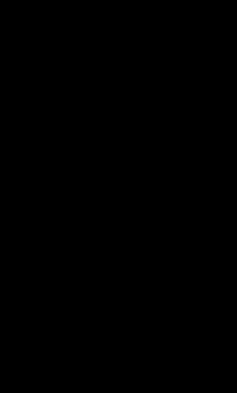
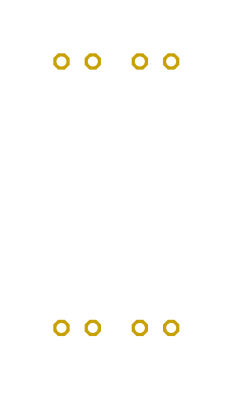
part: none -> (77, 61)
part: none -> (155, 61)
part: none -> (77, 327)
part: none -> (155, 327)

